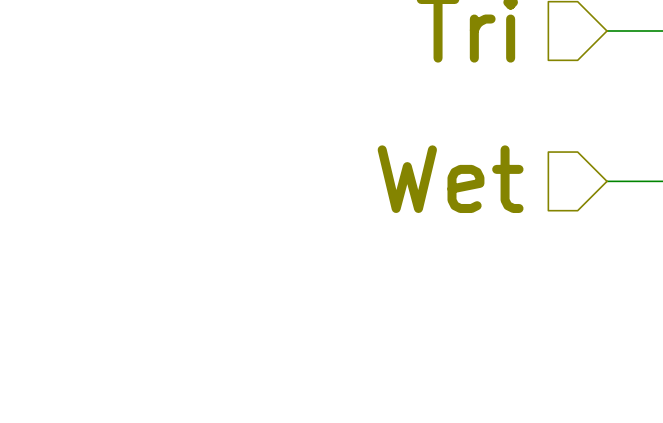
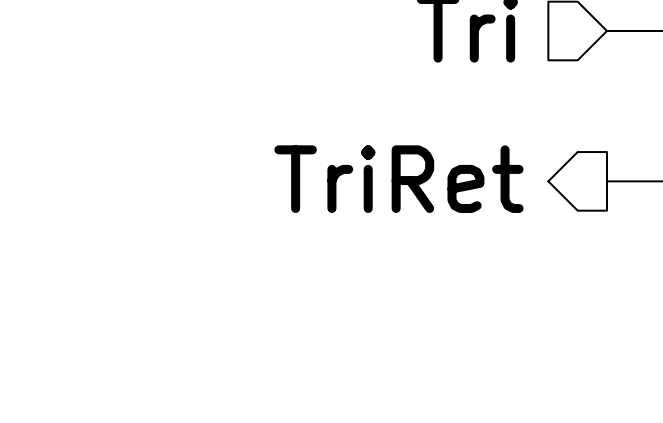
hierarchical label shape: input (450, 179) -> output (398, 179)
hierarchical label: Wet (450, 179) -> TriRet (398, 179)

